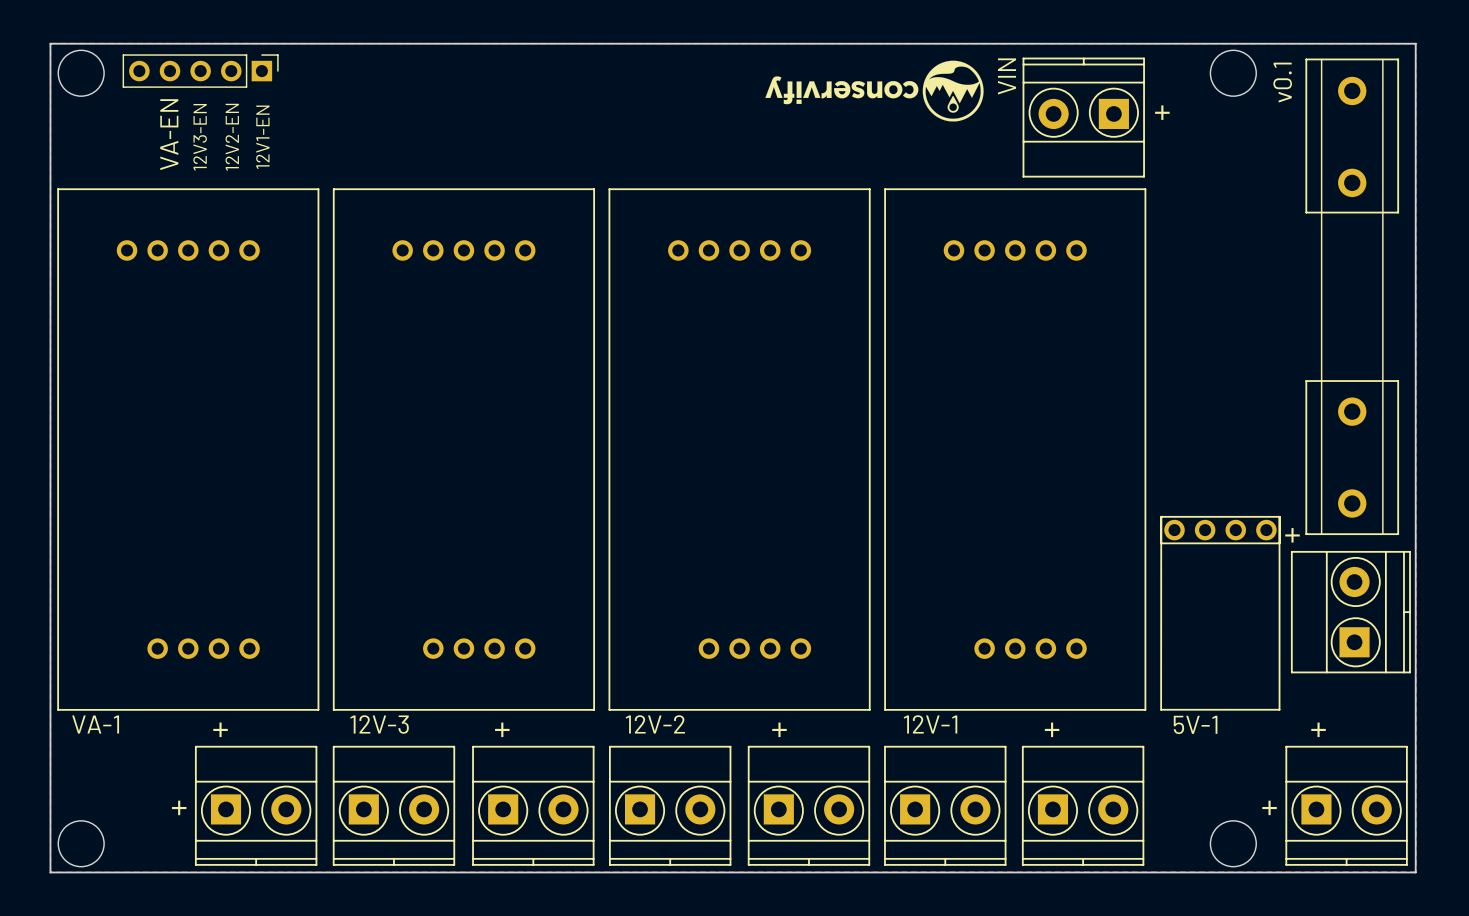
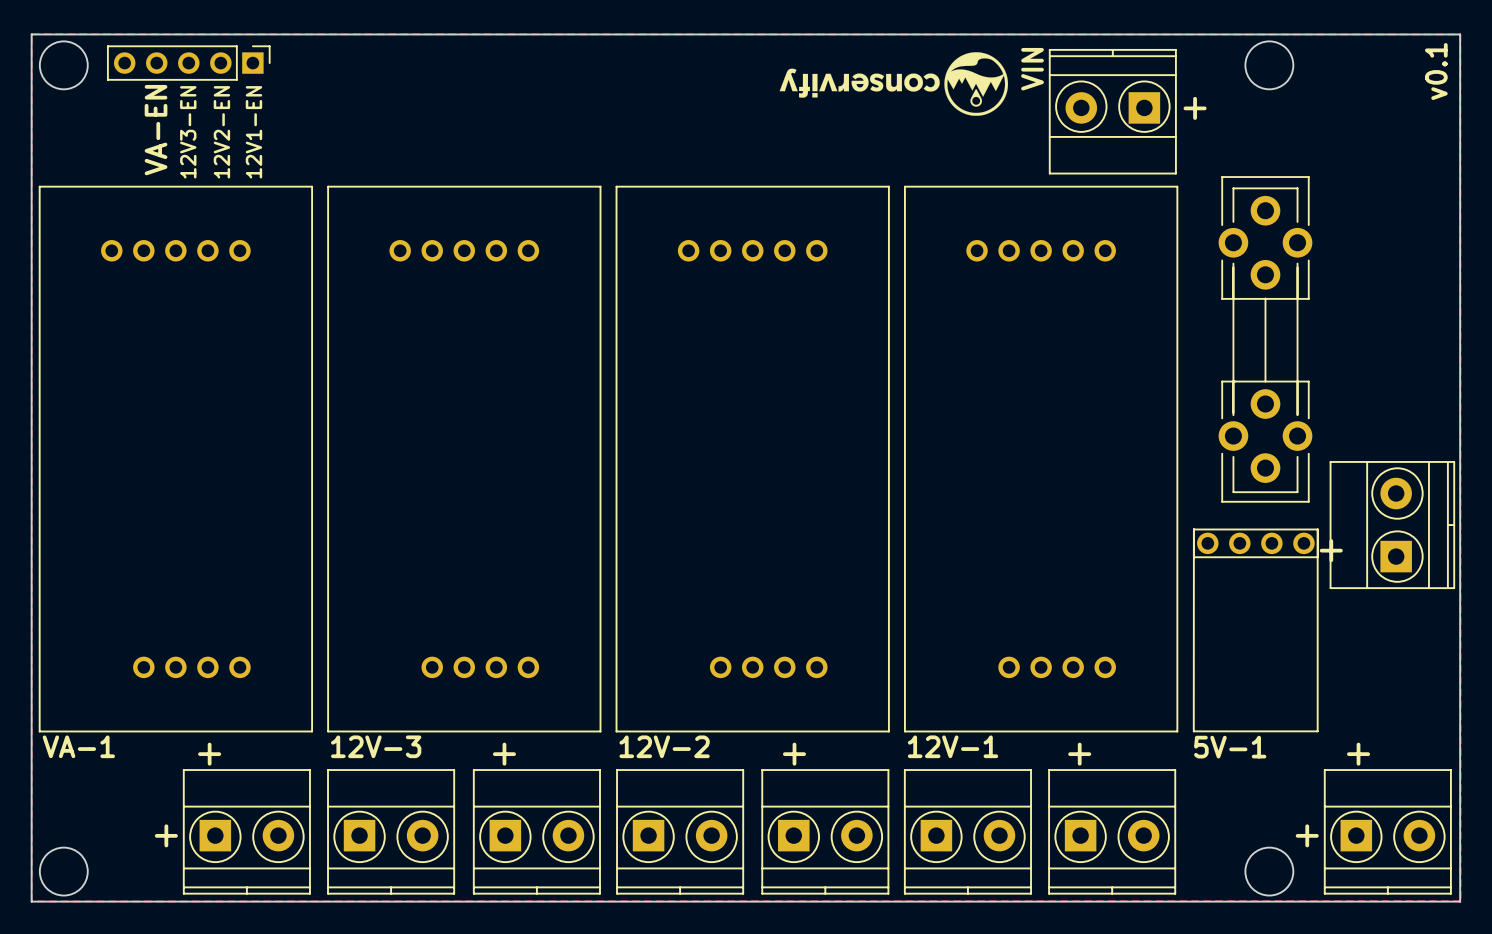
text position: v0.1 (1282, 82) -> v0.1 (1436, 71)
part: (1352, 296) -> none
part: none -> (1265, 339)
part position: (1350, 612) -> (1392, 525)

